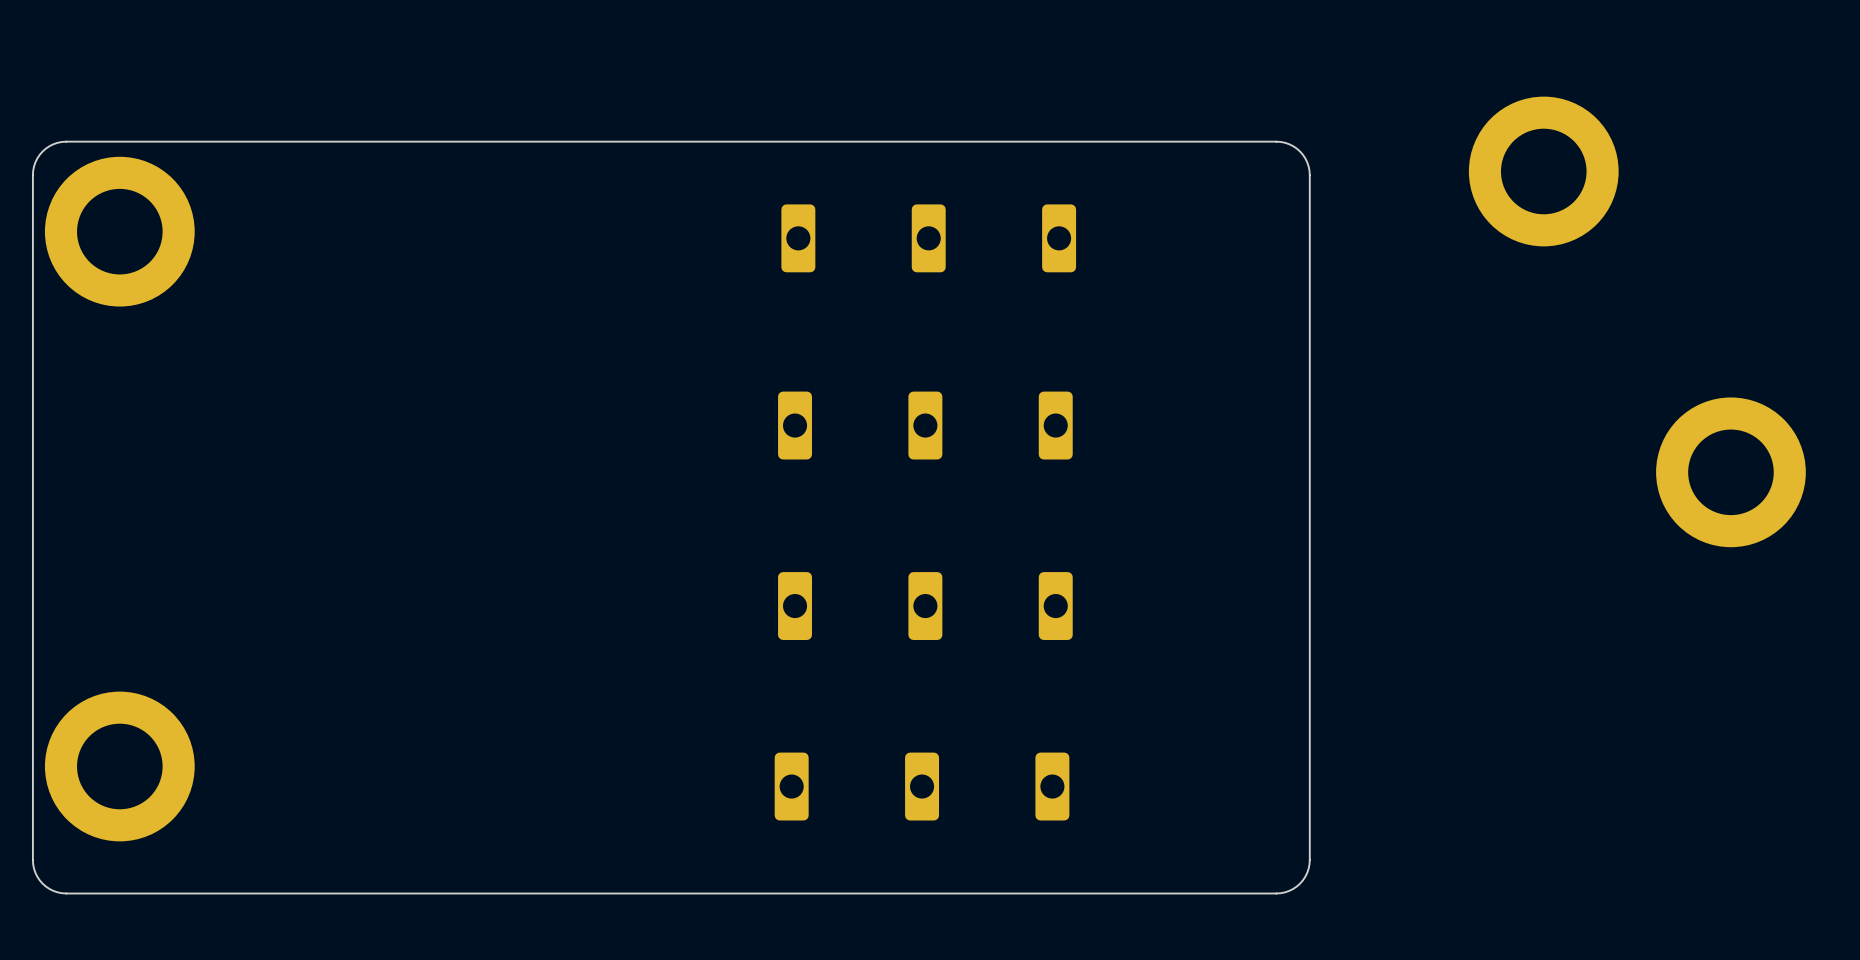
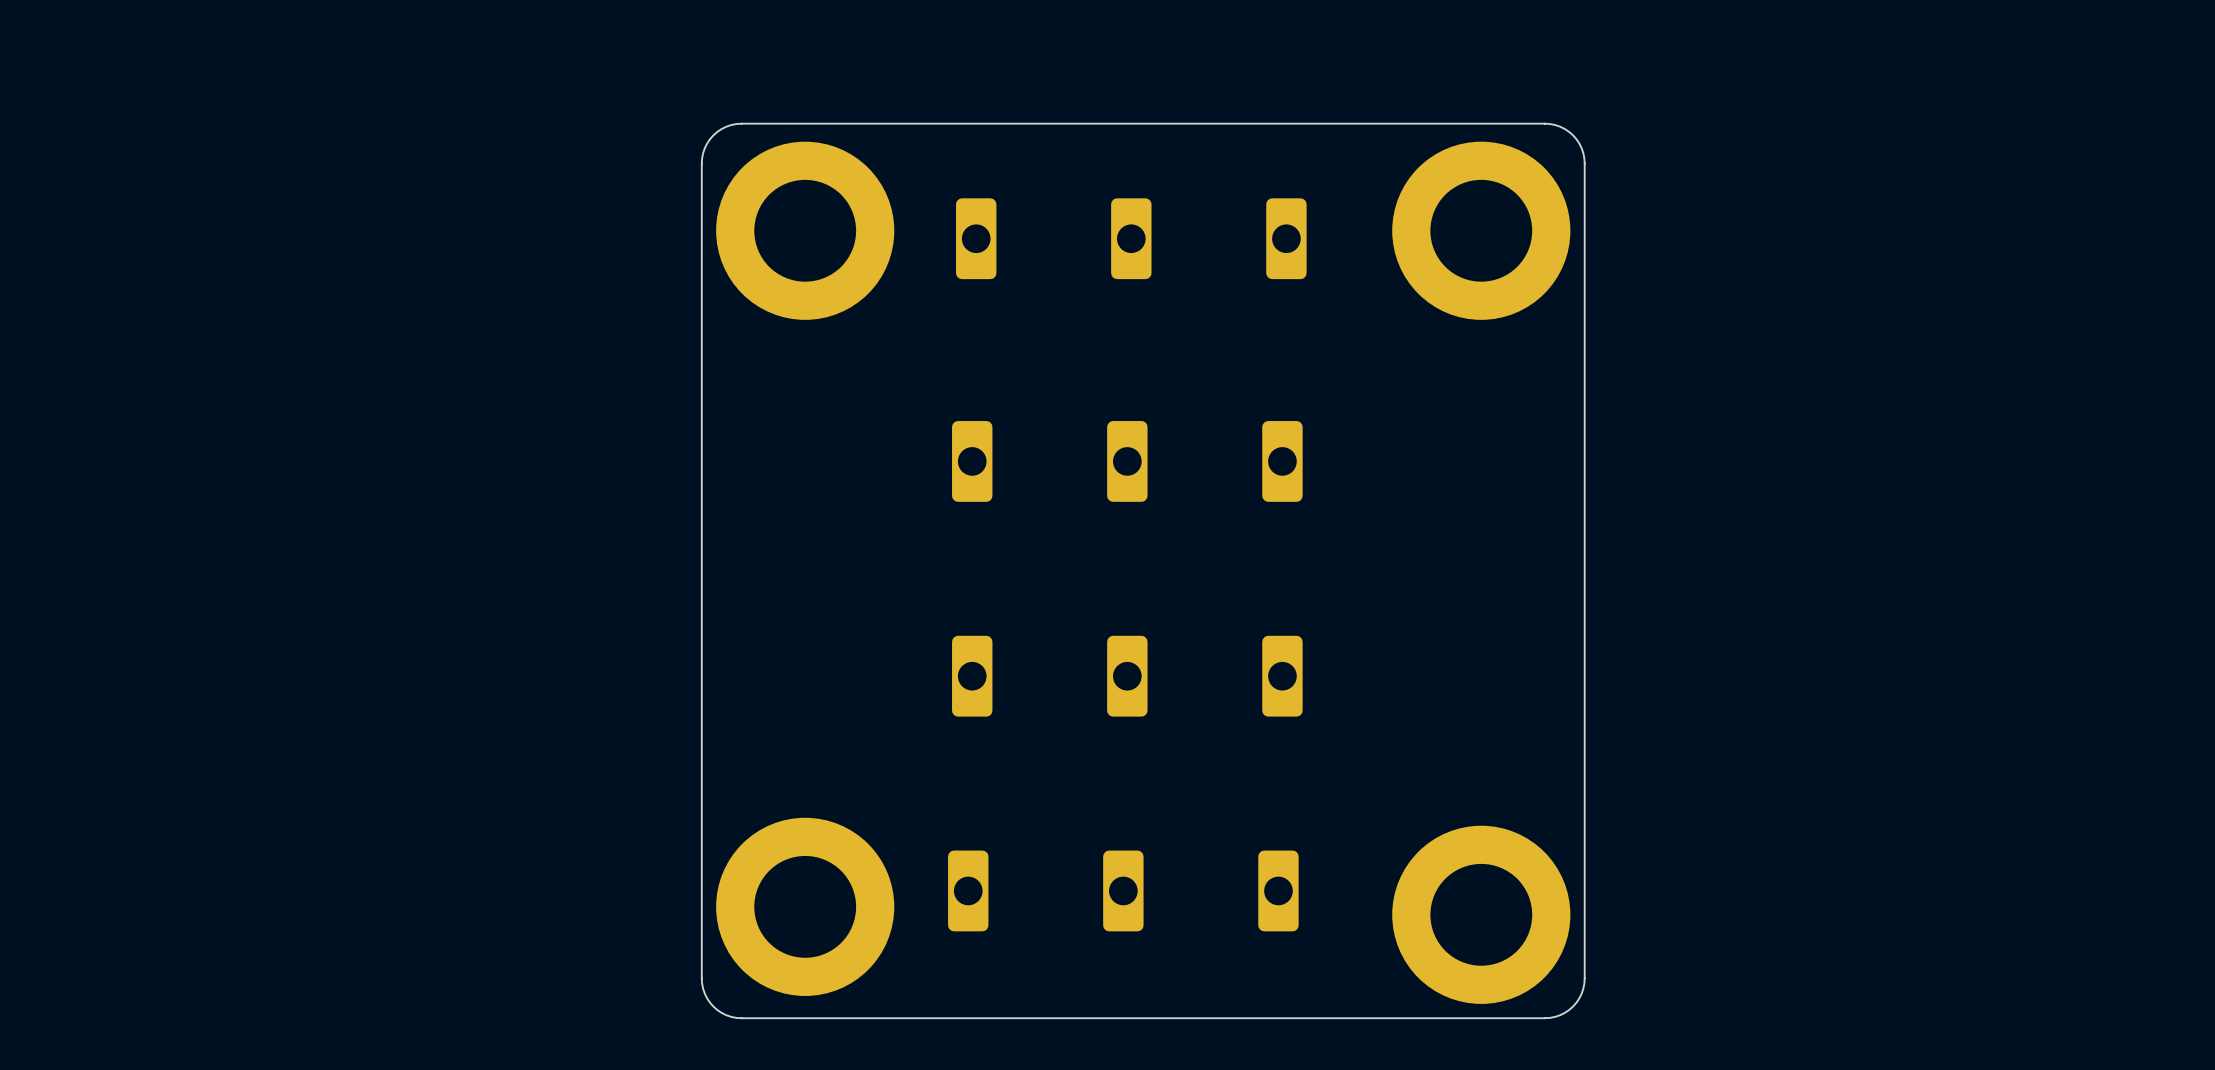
board edge: (601, 141) (66, 141) (53, 144) (42, 151) (35, 162) (32, 175) -> (741, 123) (726, 126) (713, 135) (704, 148) (701, 163)
part: (1543, 171) -> none
board edge: (32, 175) (32, 860) (35, 872) (39, 880) (49, 889) (66, 893) (601, 893) -> (701, 163) (701, 978) (704, 993) (713, 1006) (726, 1015) (741, 1018)
part: (119, 231) -> none
part: none -> (805, 230)
part: none -> (1481, 230)
part: (1730, 472) -> none
part: (119, 766) -> none
part: none -> (805, 906)
part: none -> (1481, 914)

